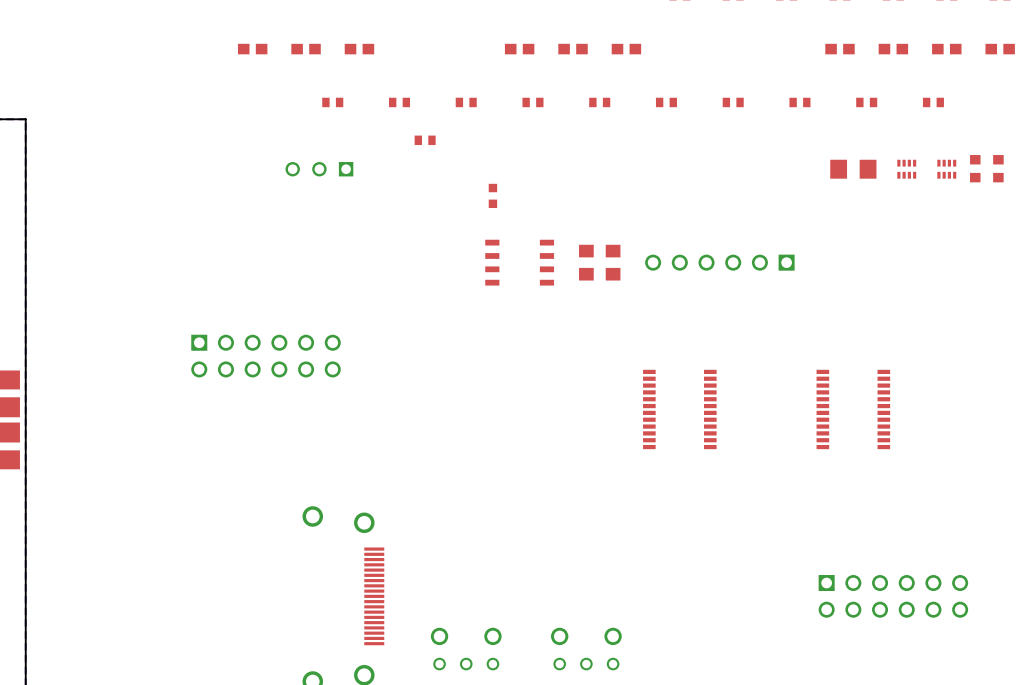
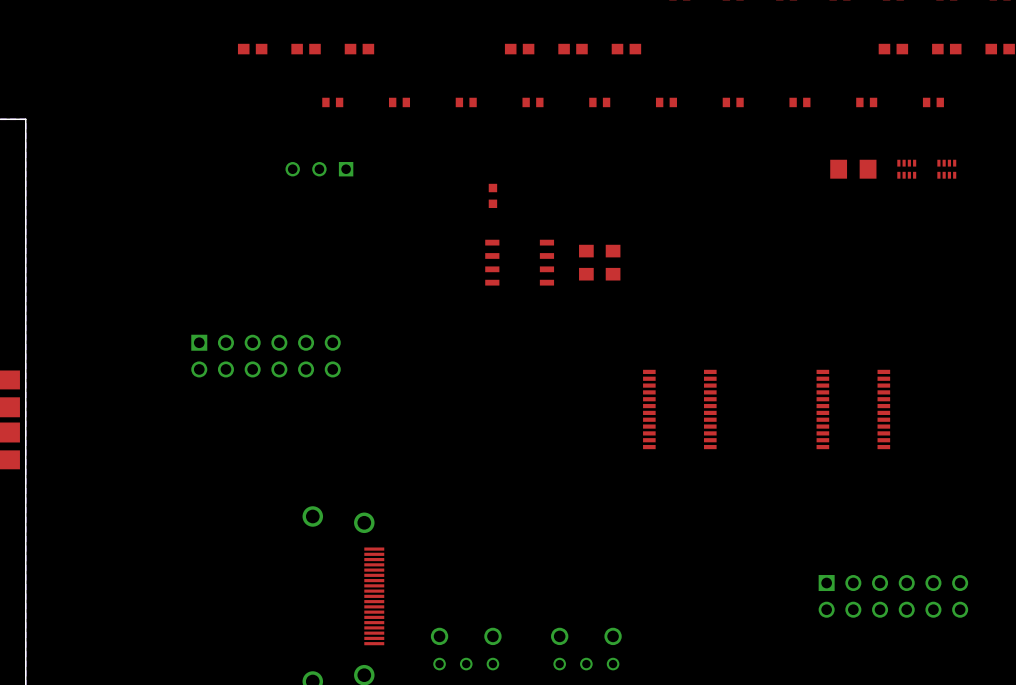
part: (840, 49) -> none
part: (425, 140) -> none
part: (986, 168) -> none
part: (719, 262) -> none

